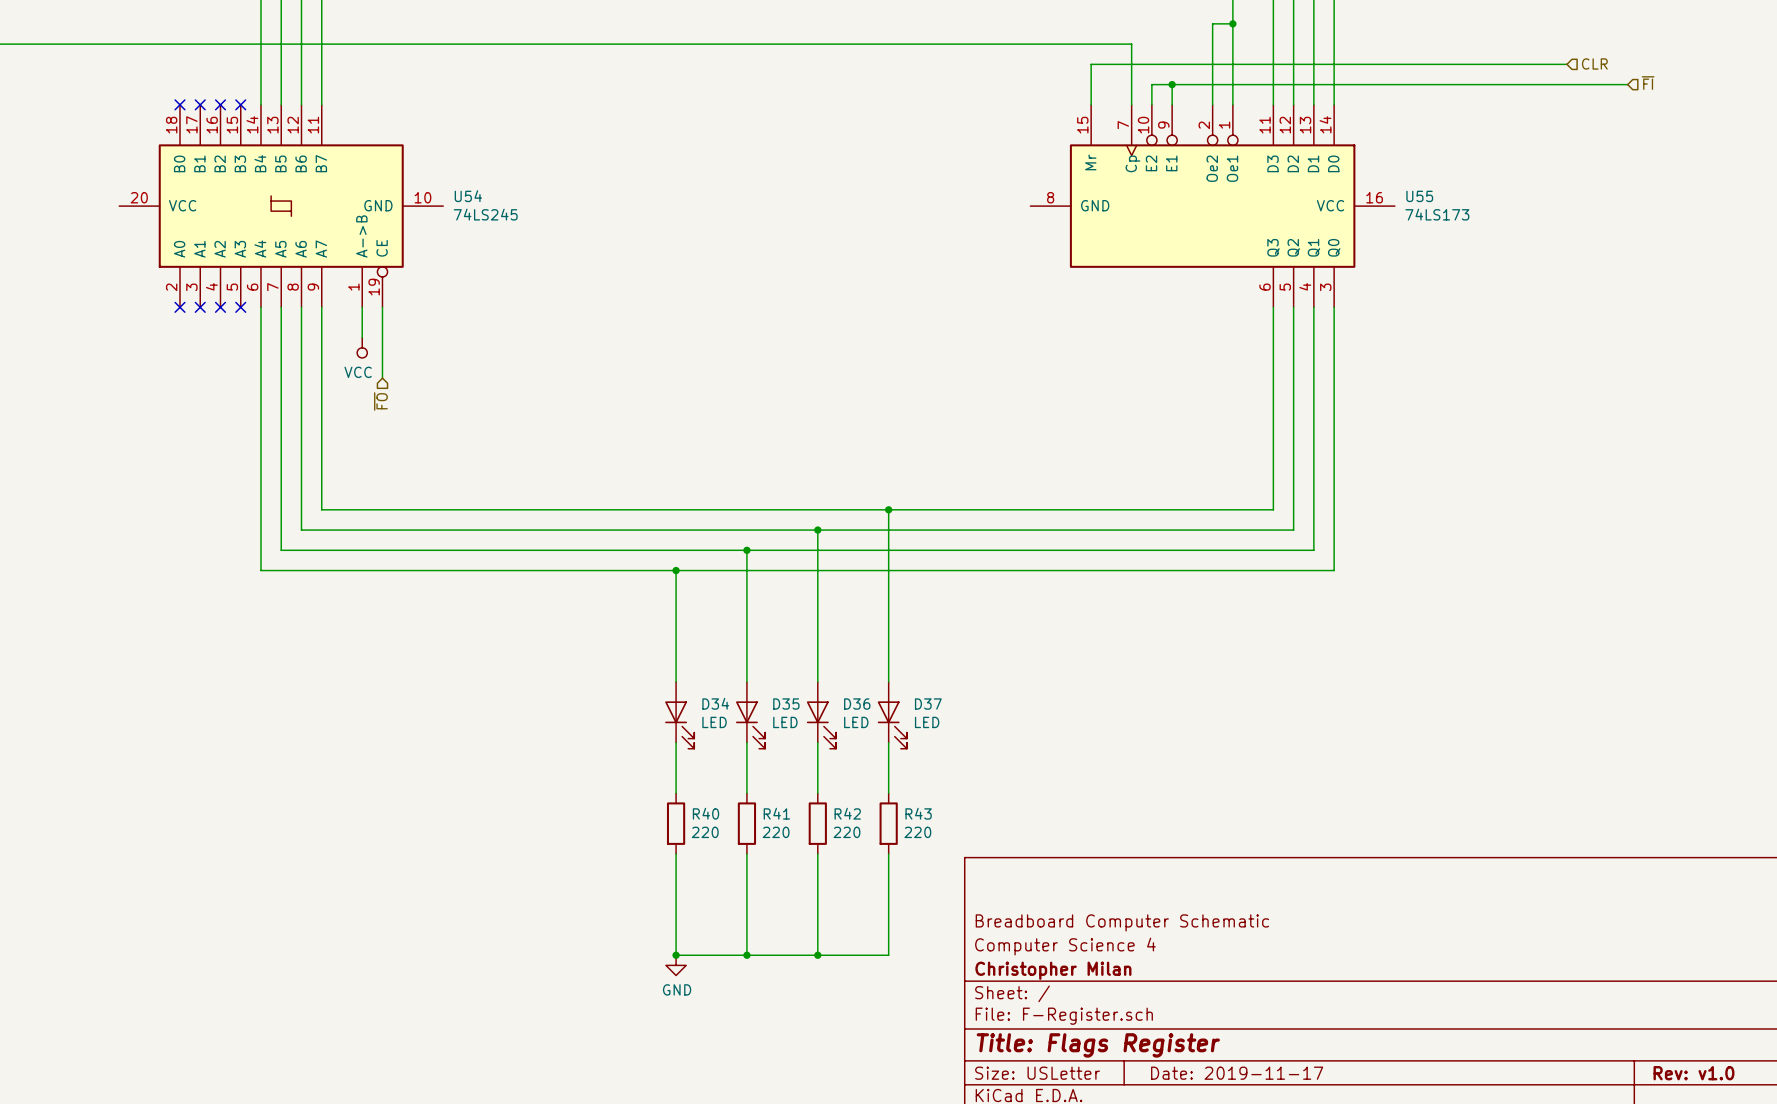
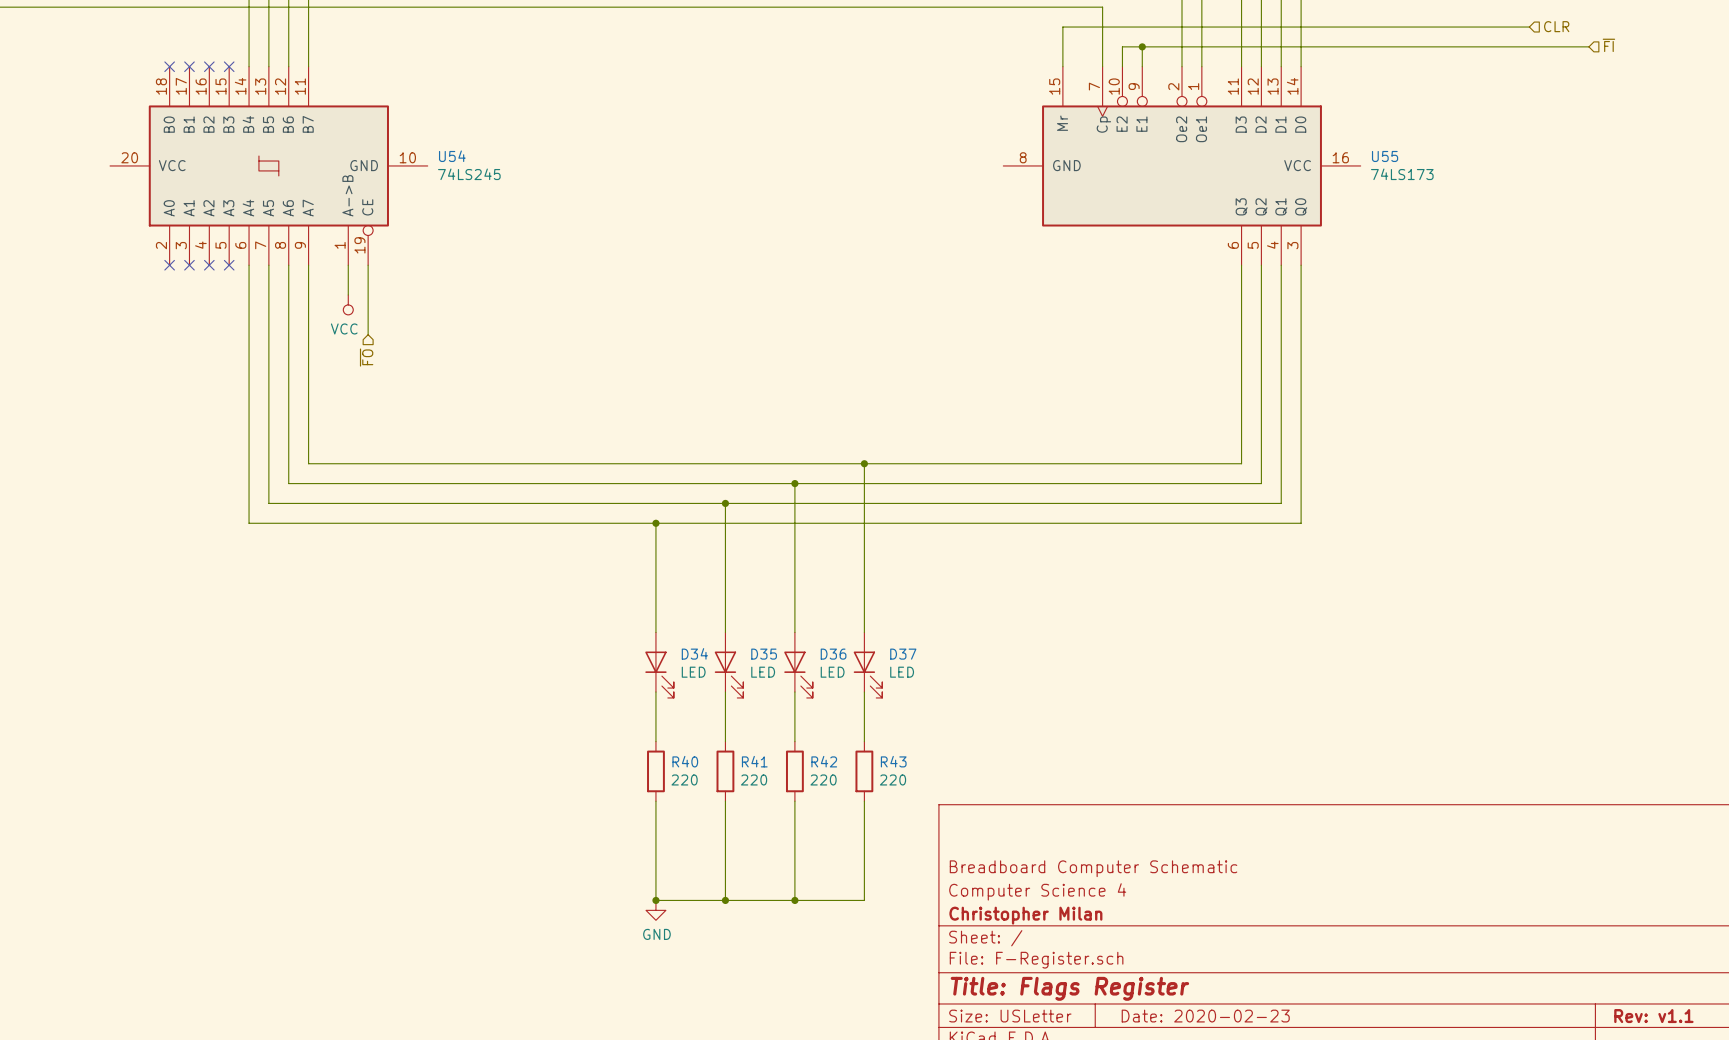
title block: Date: 2019-11-17 (1237, 1073) -> Date: 2020-02-23 (1205, 1016)
title block: Rev: v1.0 (1693, 1073) -> Rev: v1.1 (1653, 1016)

